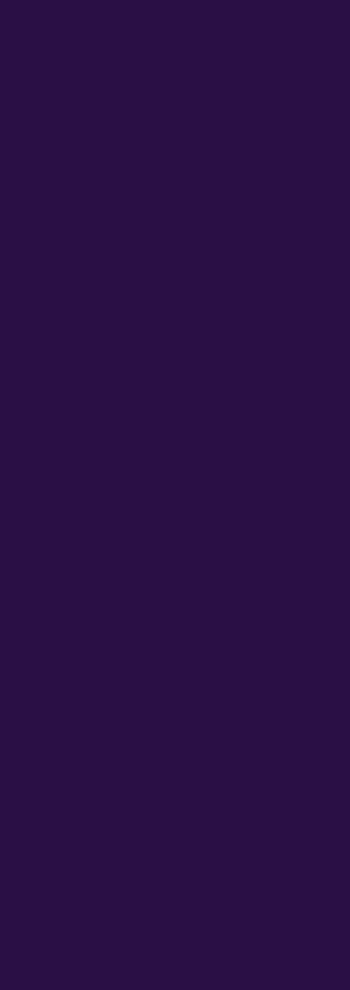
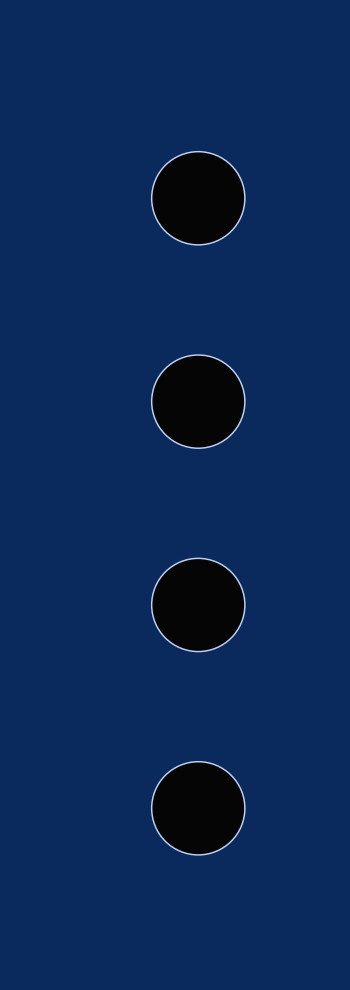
part: none -> (198, 198)
part: none -> (198, 401)
part: none -> (198, 604)
part: none -> (198, 808)

